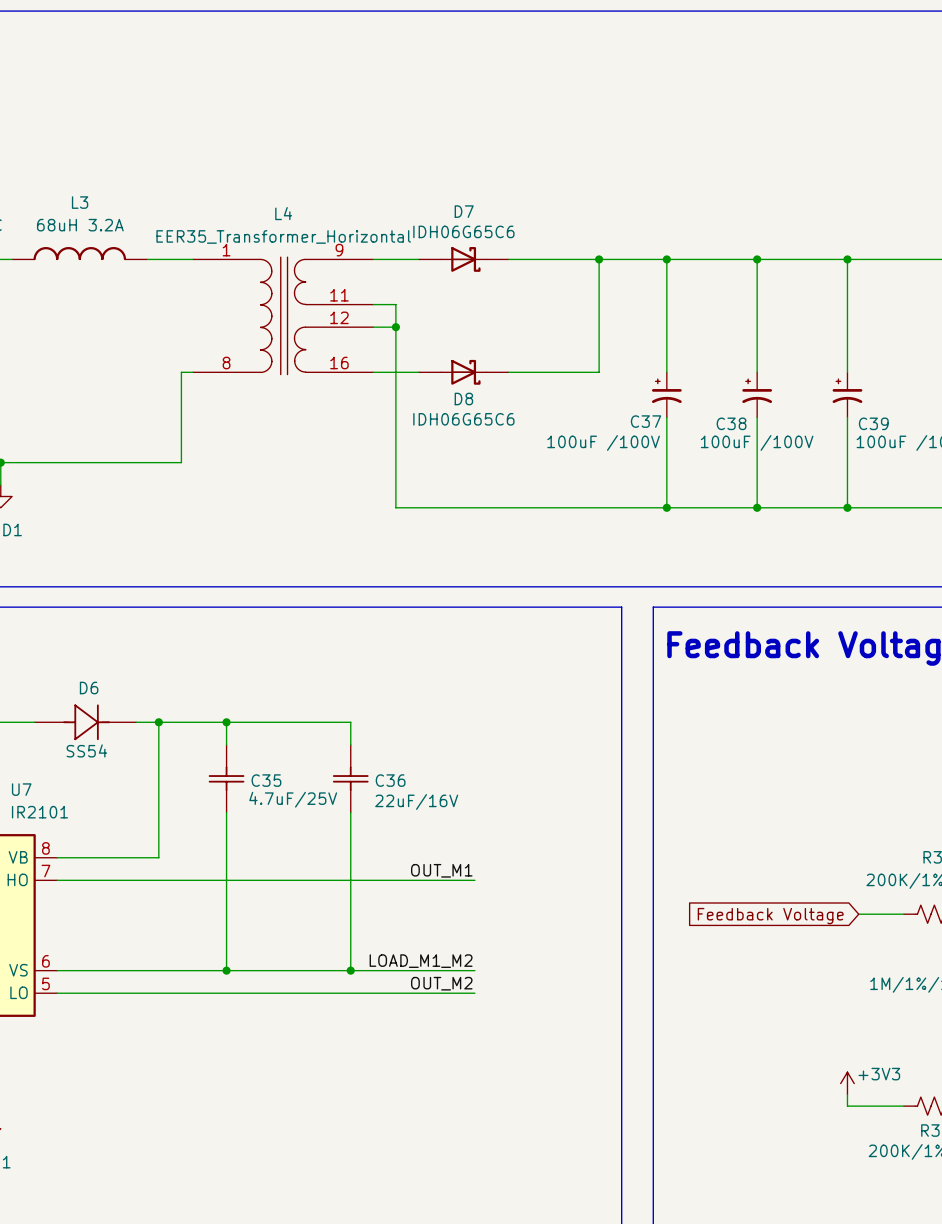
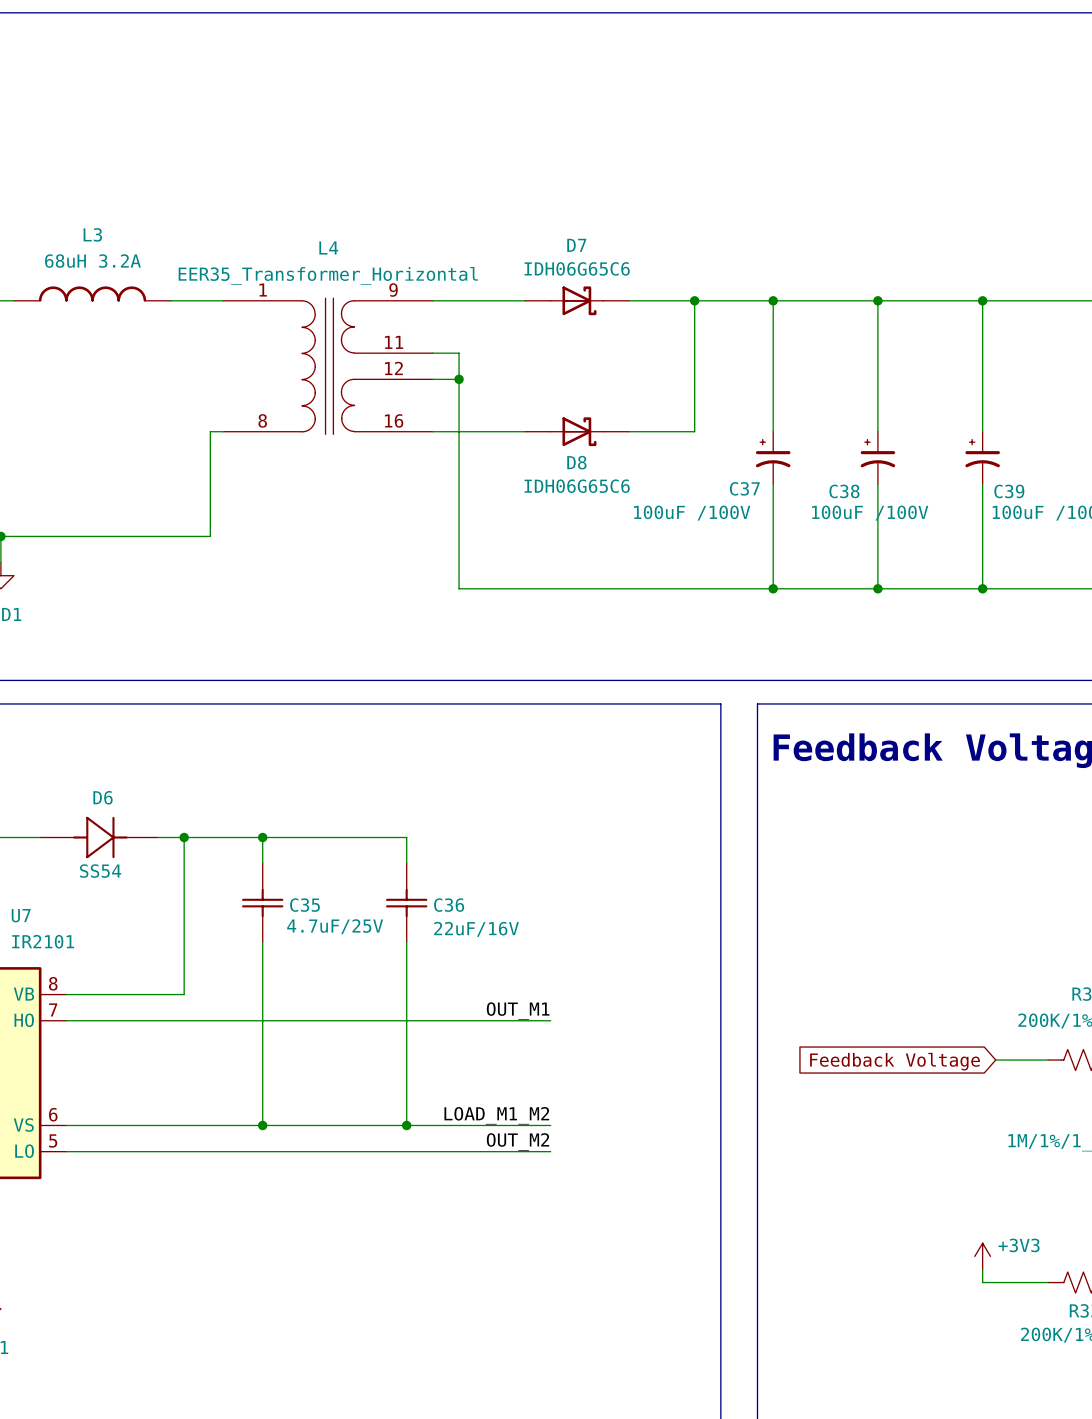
D7 position: (463, 259) -> (576, 300)
D8 position: (463, 372) -> (576, 431)

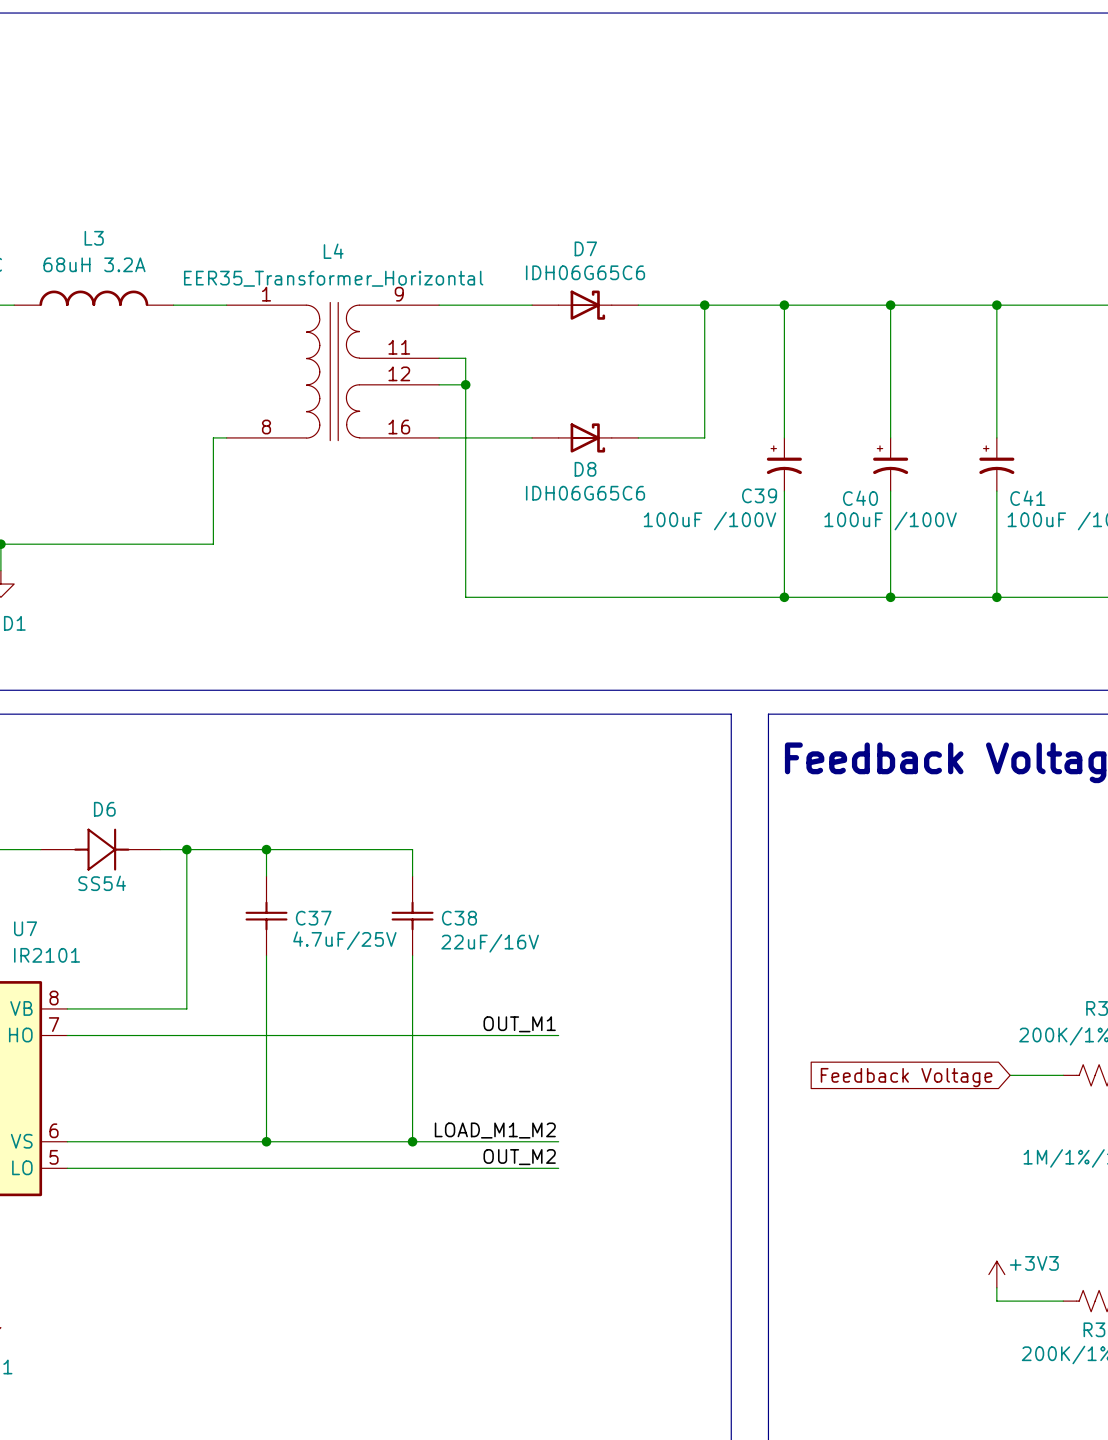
C37 name: C37 (744, 488) -> C39 (759, 495)
C38 name: C38 (844, 491) -> C40 (860, 498)
C39 name: C39 (1009, 491) -> C41 (1027, 498)
C35 name: C35 (304, 905) -> C37 (313, 918)
C36 name: C36 (449, 905) -> C38 (459, 918)

